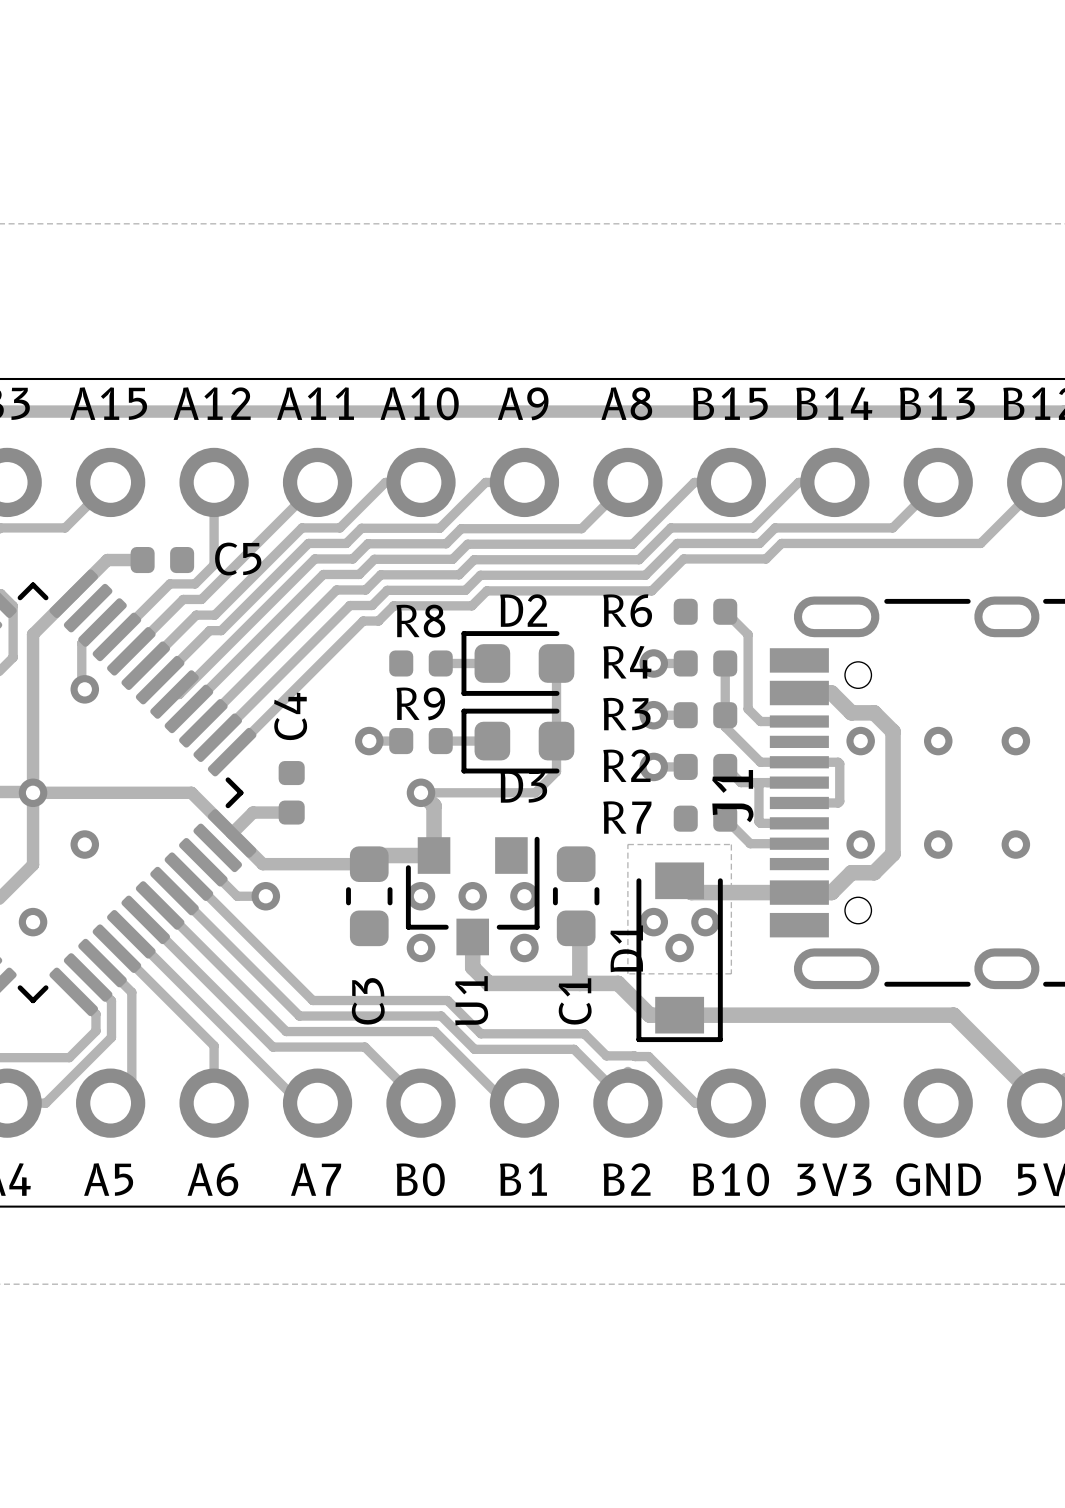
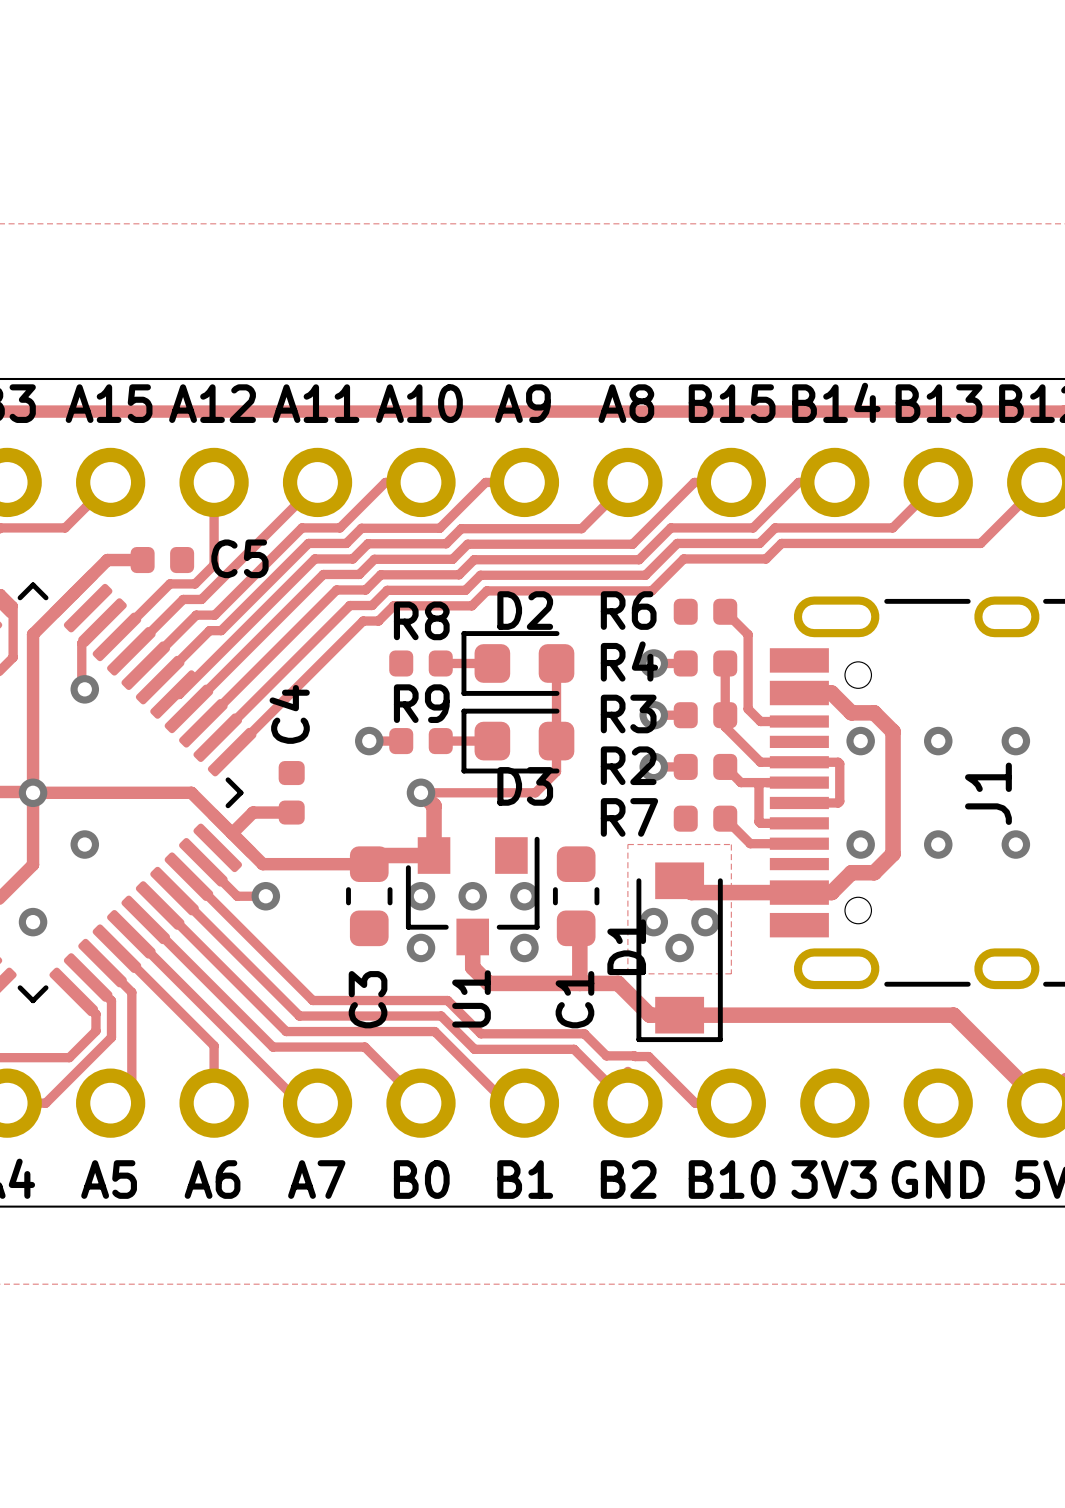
J1 name position: J1 (732, 796) -> J1 (988, 793)

